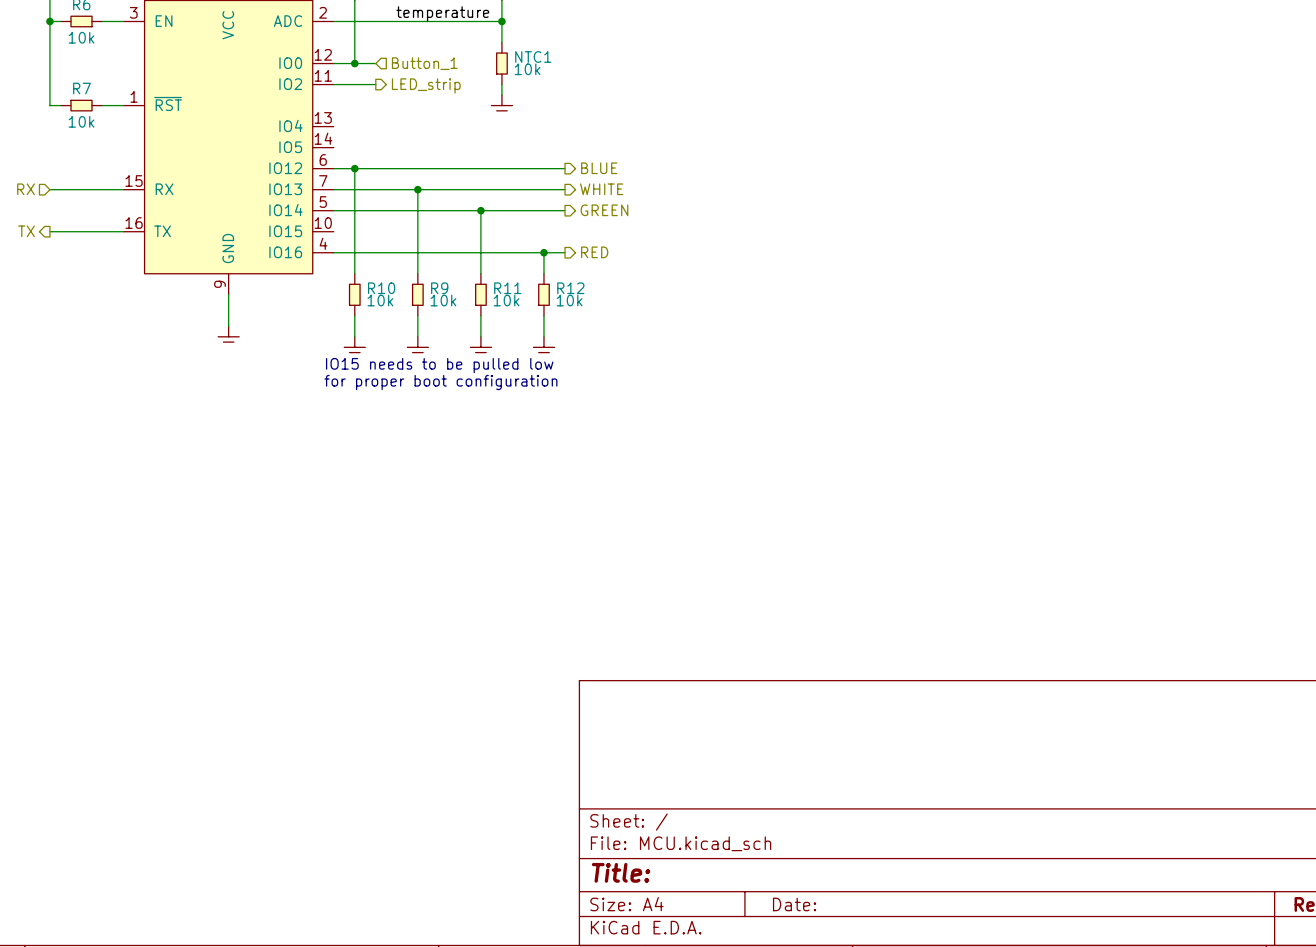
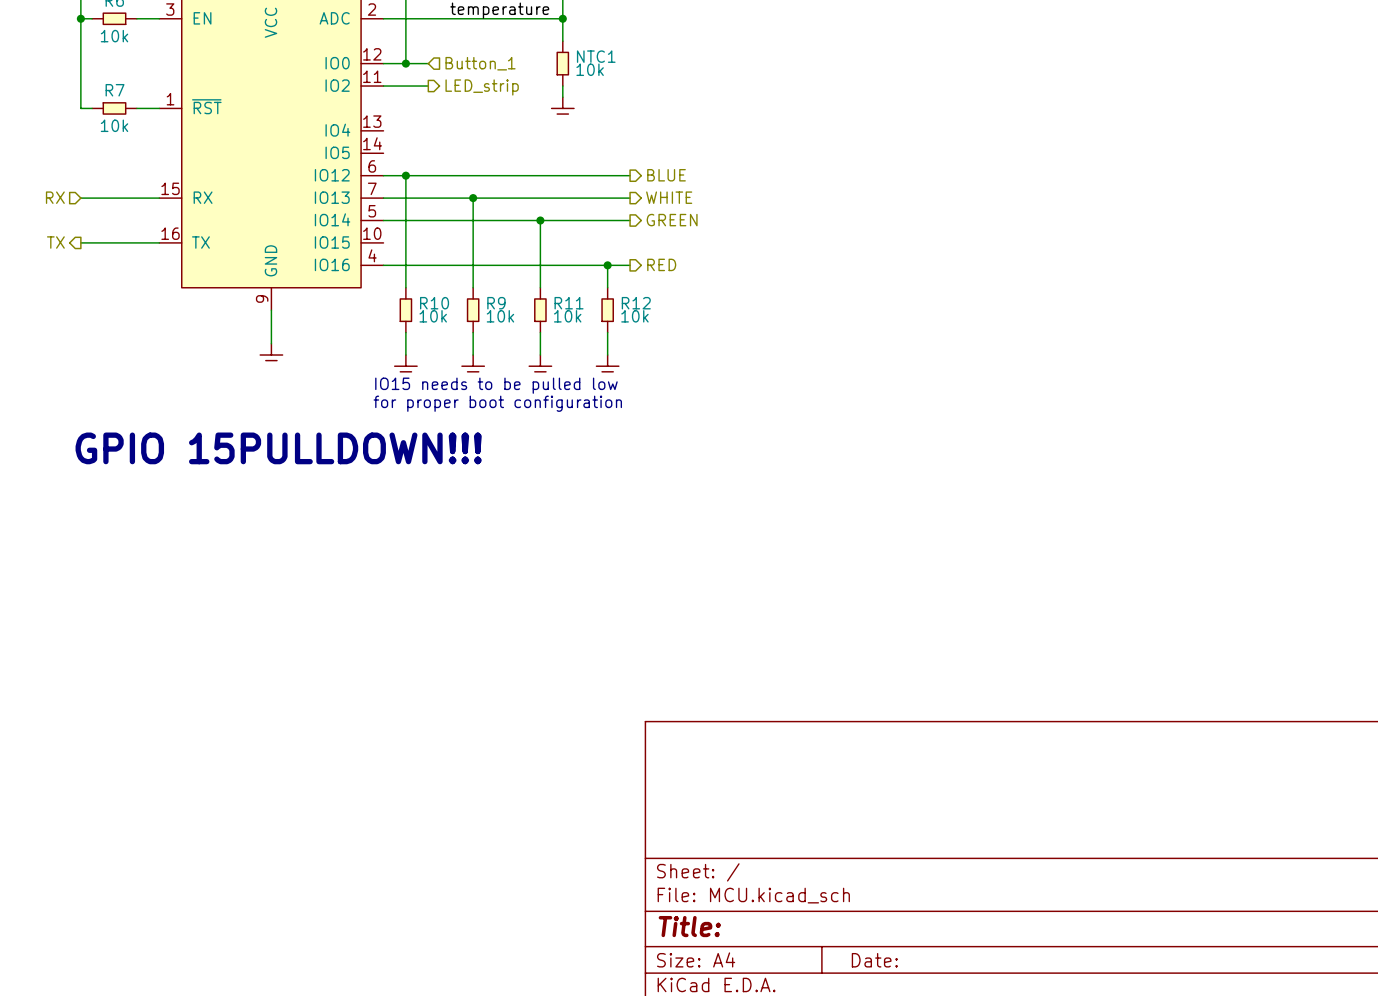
text: none -> GPIO 15PULLDOWN!!! (278, 448)

